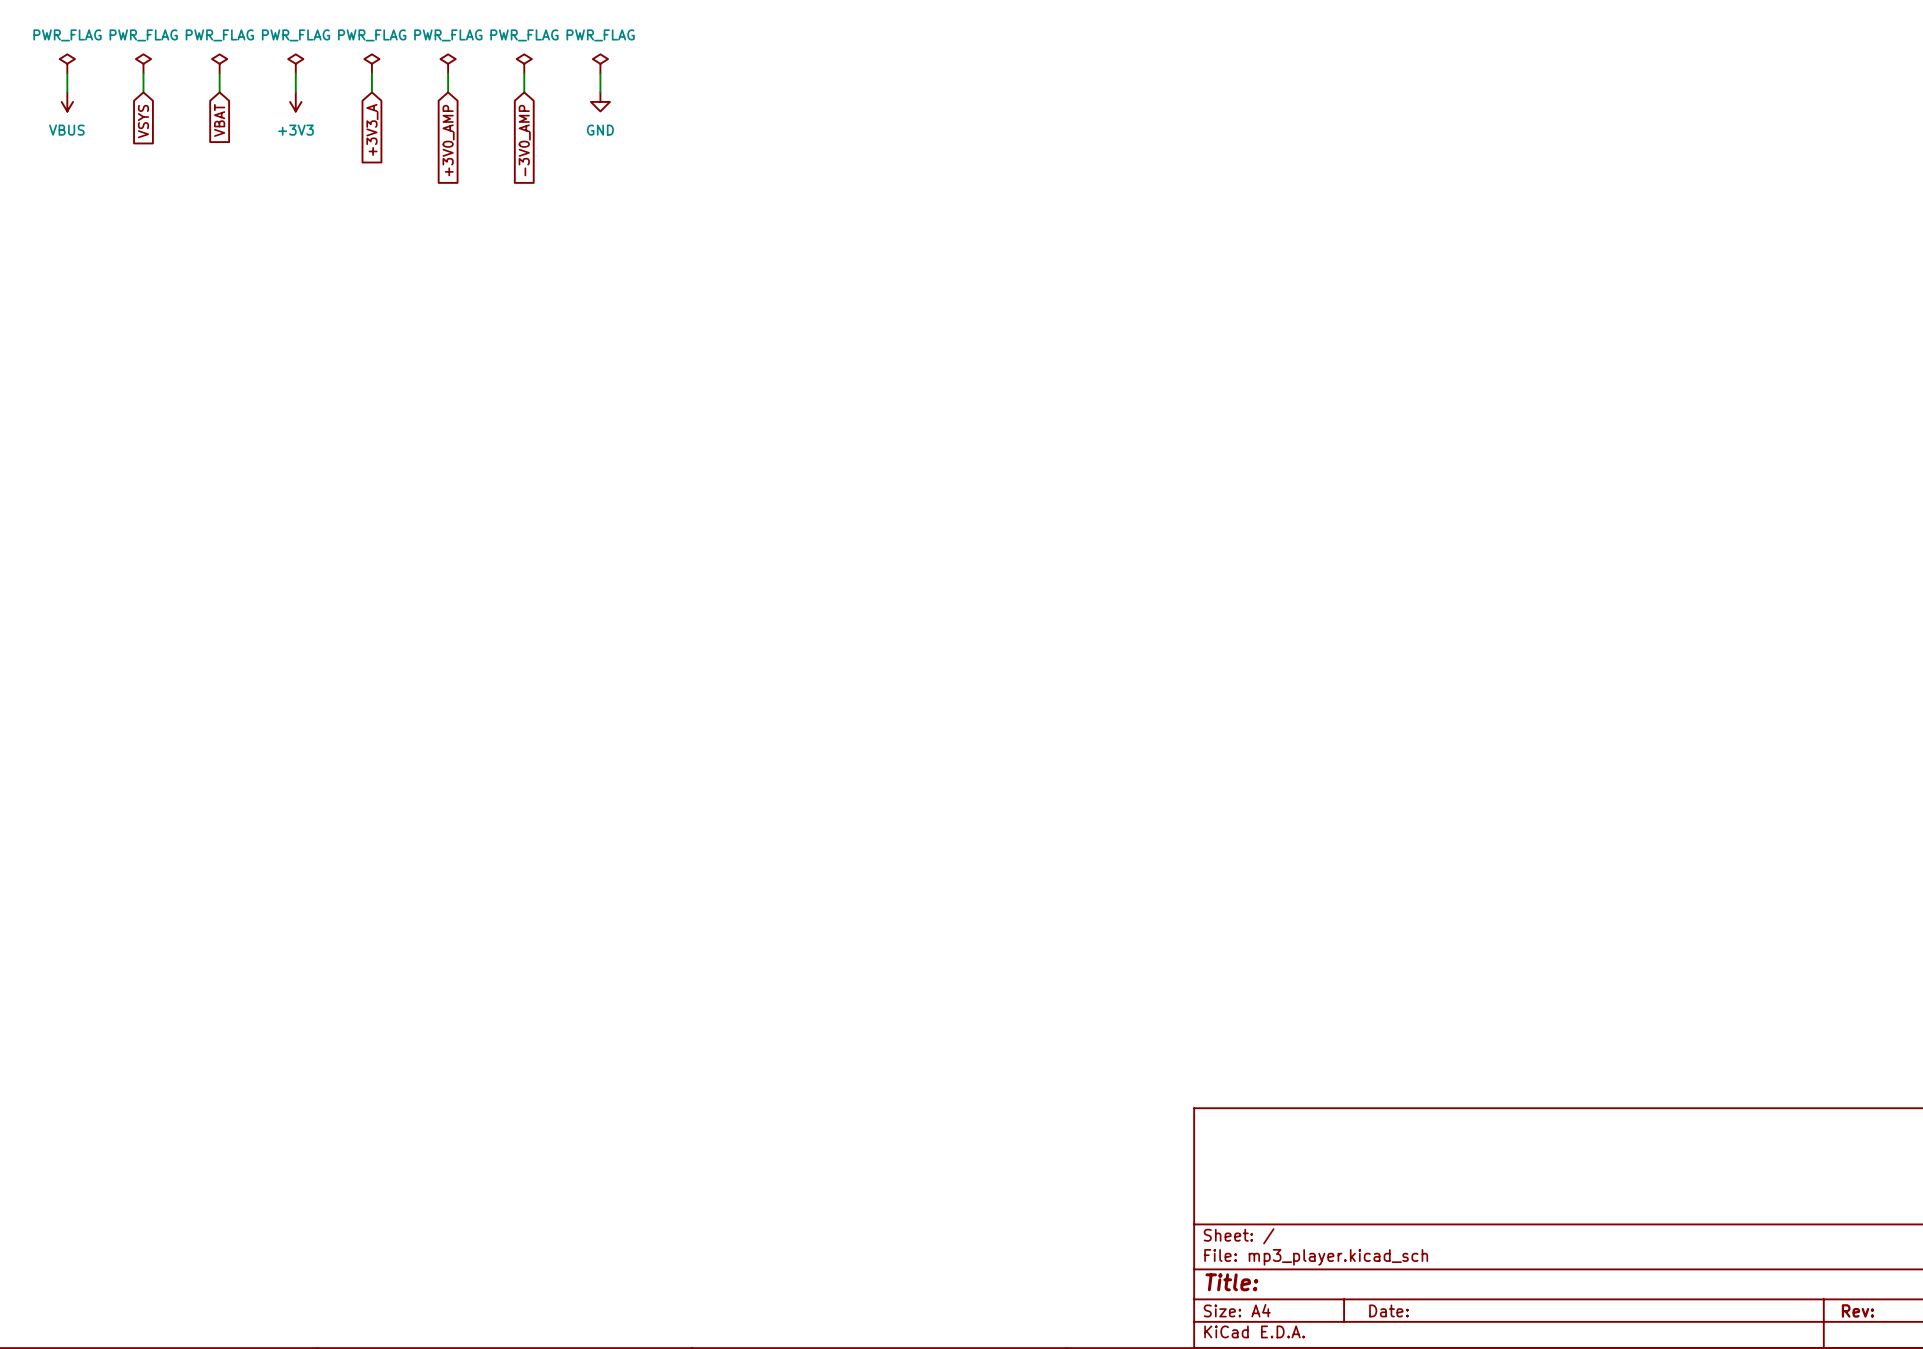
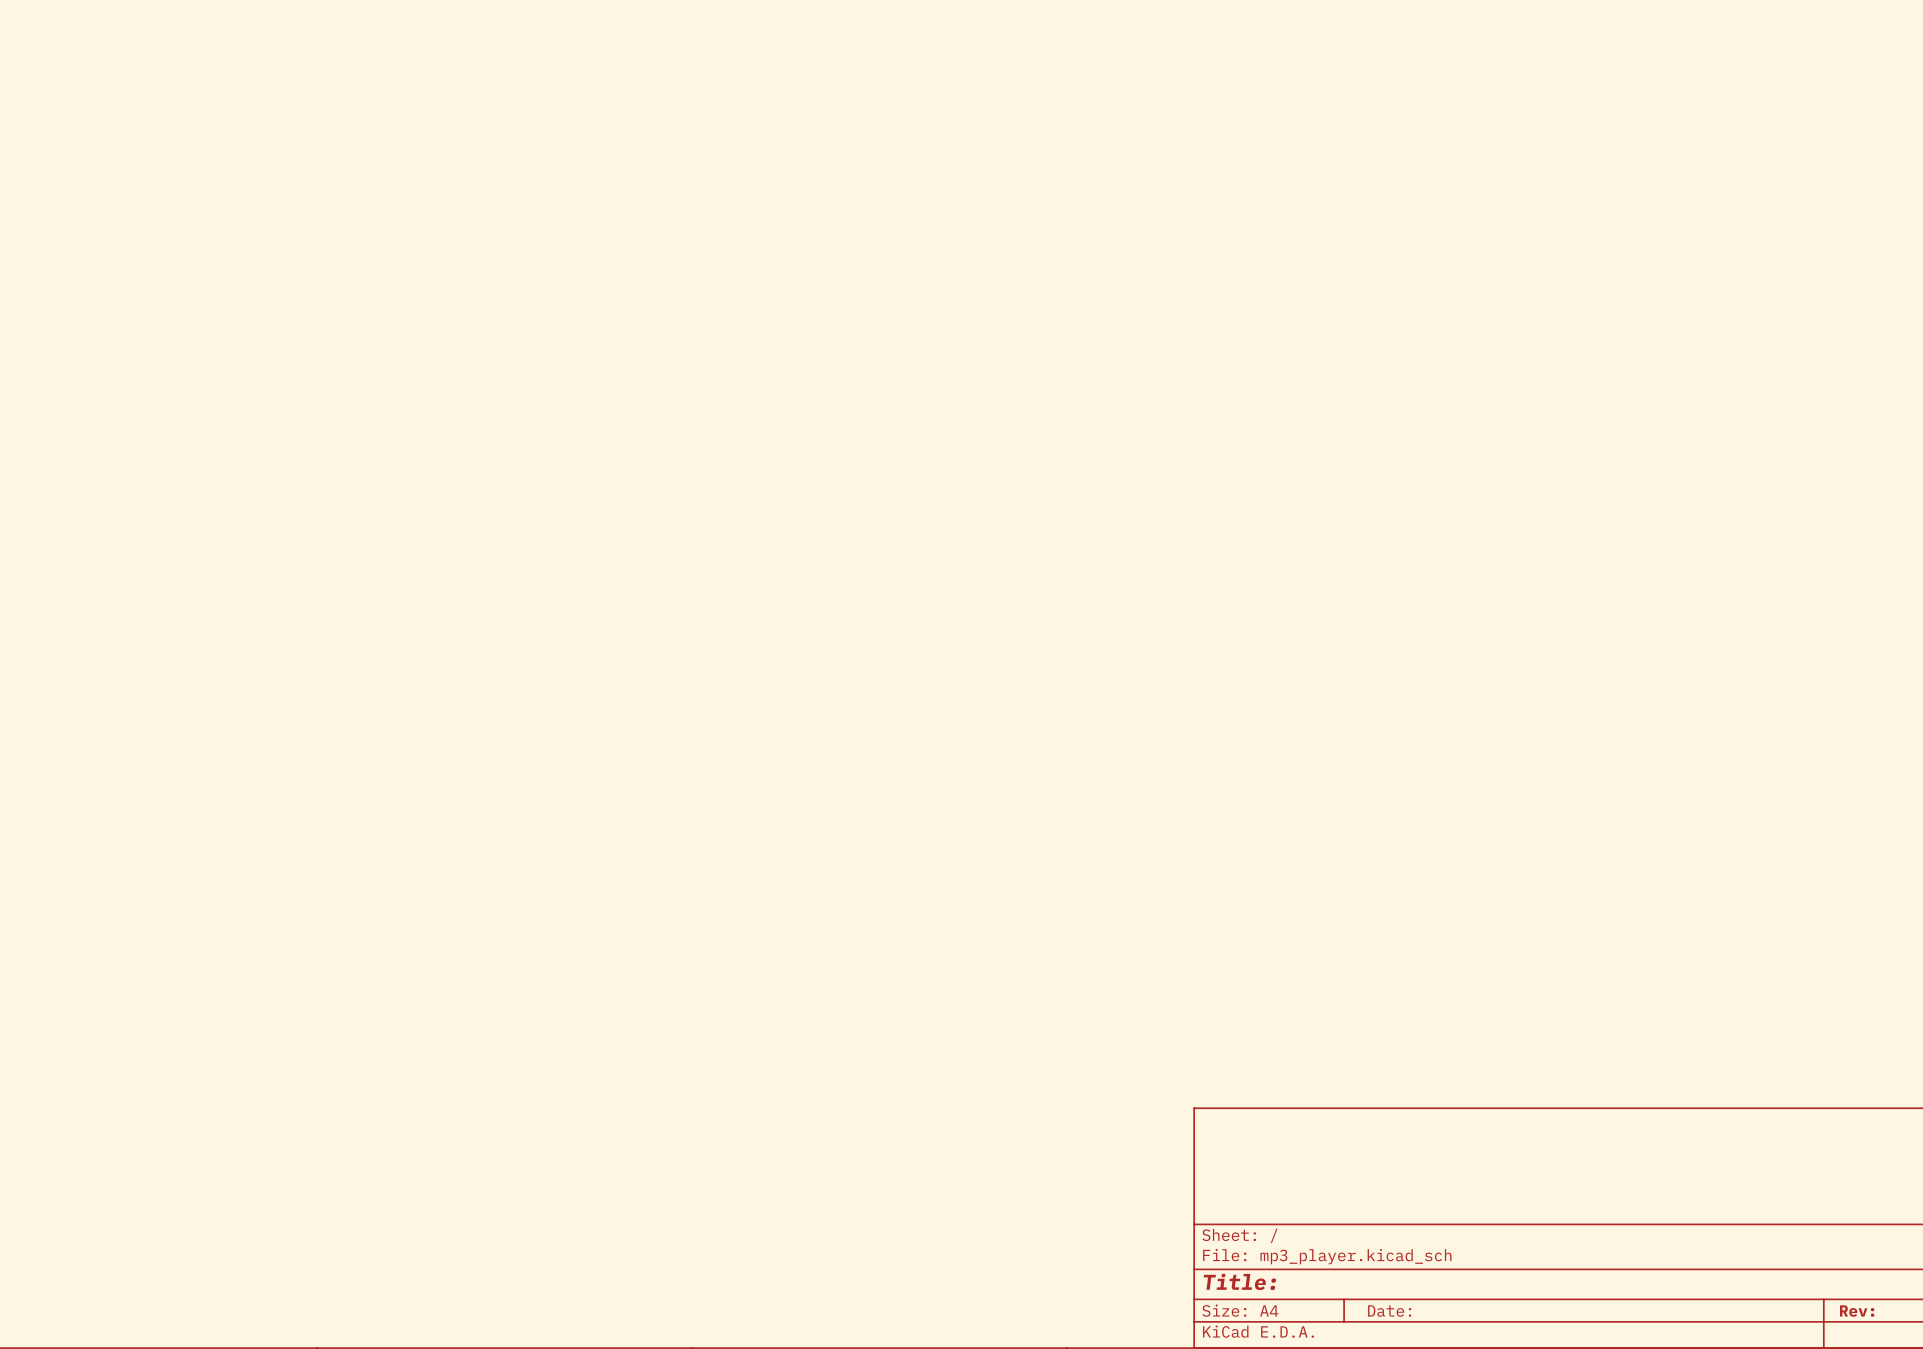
power symbol: PWR_FLAG (67, 63) -> none
power symbol: PWR_FLAG (143, 63) -> none
power symbol: PWR_FLAG (219, 63) -> none
power symbol: PWR_FLAG (295, 63) -> none
power symbol: PWR_FLAG (371, 63) -> none
power symbol: PWR_FLAG (448, 63) -> none
power symbol: PWR_FLAG (524, 63) -> none
power symbol: PWR_FLAG (600, 63) -> none
wire: (67, 73) (67, 92) -> none
wire: (143, 73) (143, 92) -> none
wire: (219, 73) (219, 92) -> none
wire: (295, 73) (295, 92) -> none
wire: (371, 73) (371, 92) -> none
wire: (448, 73) (448, 92) -> none
wire: (524, 73) (524, 92) -> none
wire: (600, 73) (600, 92) -> none
power symbol: VBUS (67, 101) -> none
power symbol: +3V3 (295, 101) -> none
power symbol: GND (600, 101) -> none
global label: VBAT (219, 120) -> none
global label: VSYS (143, 121) -> none
global label: +3V3_A (372, 129) -> none
global label: +3V0_AMP (448, 140) -> none
global label: -3V0_AMP (524, 140) -> none

